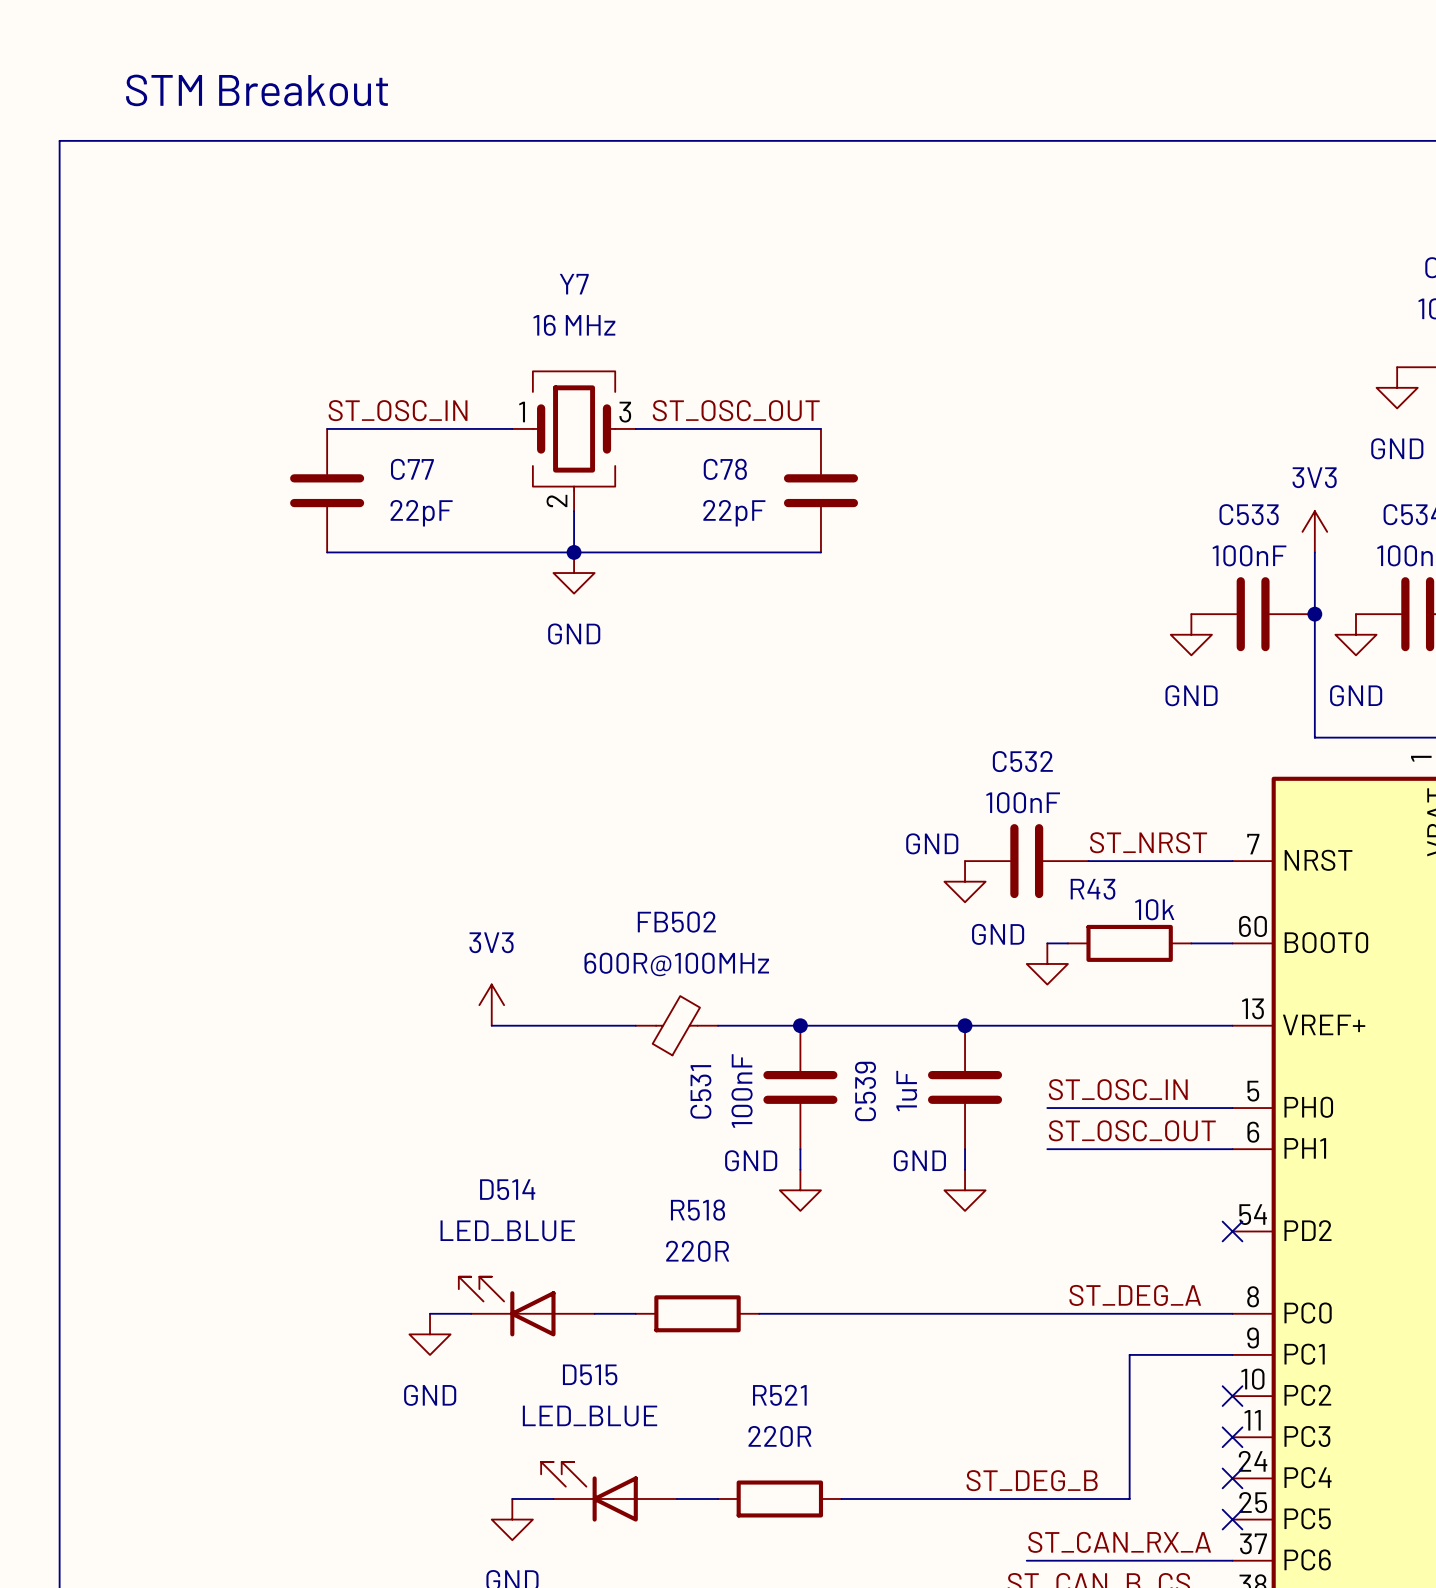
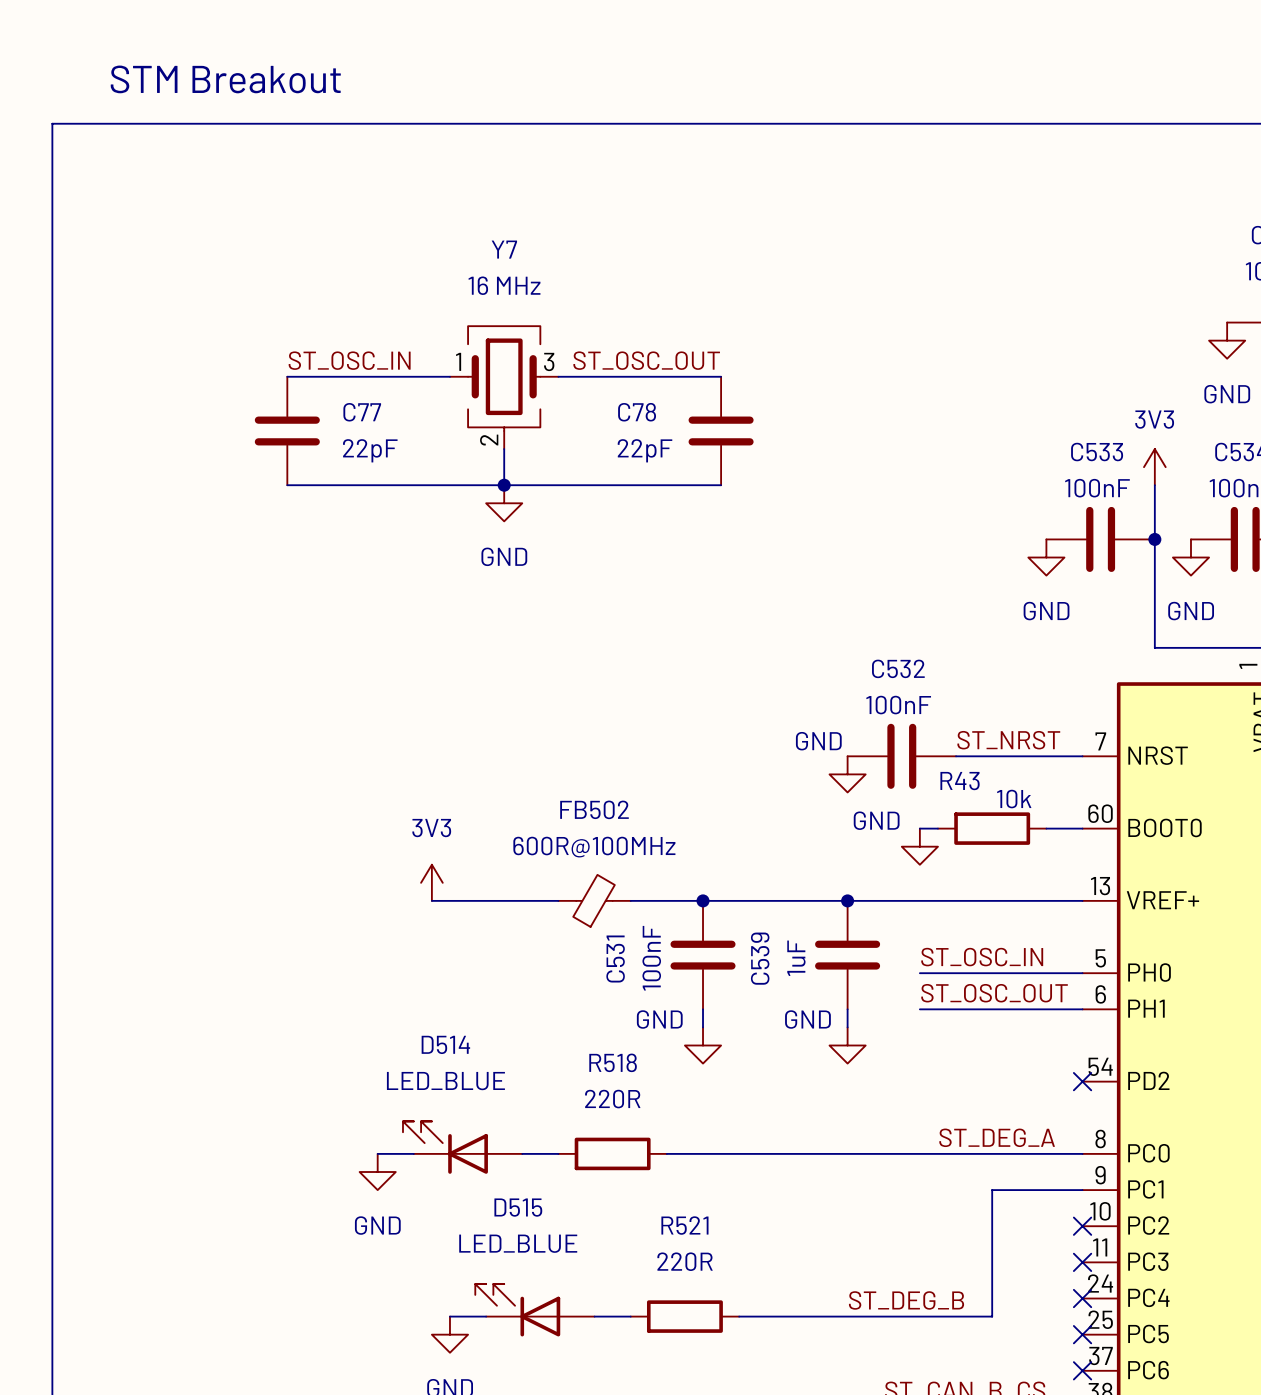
label: ST_CAN_RX_A (1119, 1542) -> none
wire: (1026, 1560) (1232, 1560) -> none
no-connect mark: none -> (1082, 1370)

